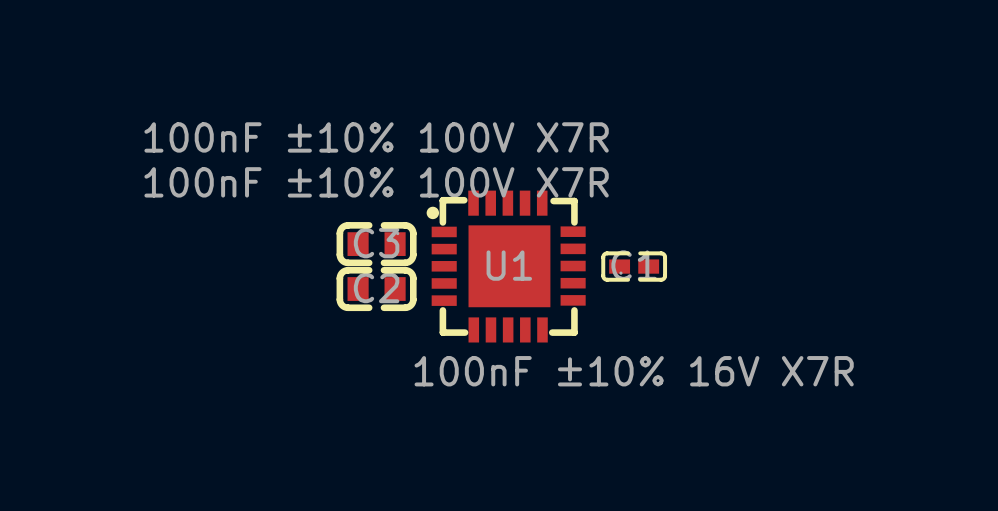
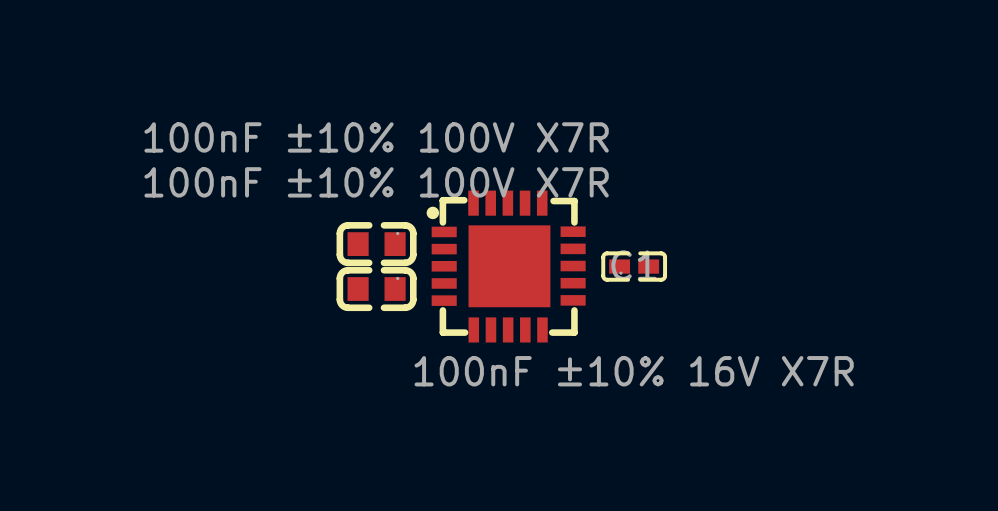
C3 name: C3 (376, 243) -> none
U1 name: U1 (509, 265) -> none
C2 name: C2 (376, 288) -> none

